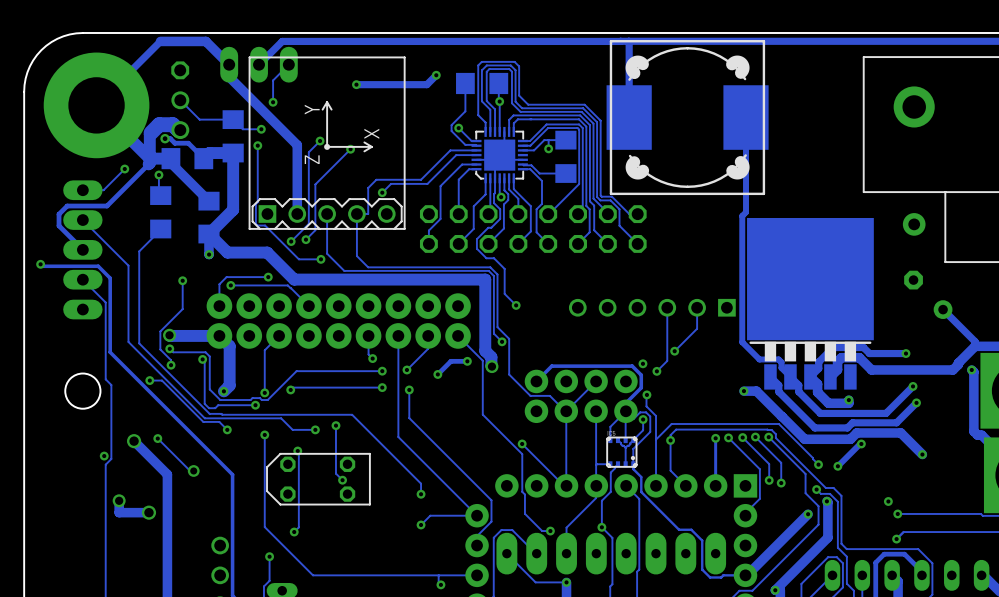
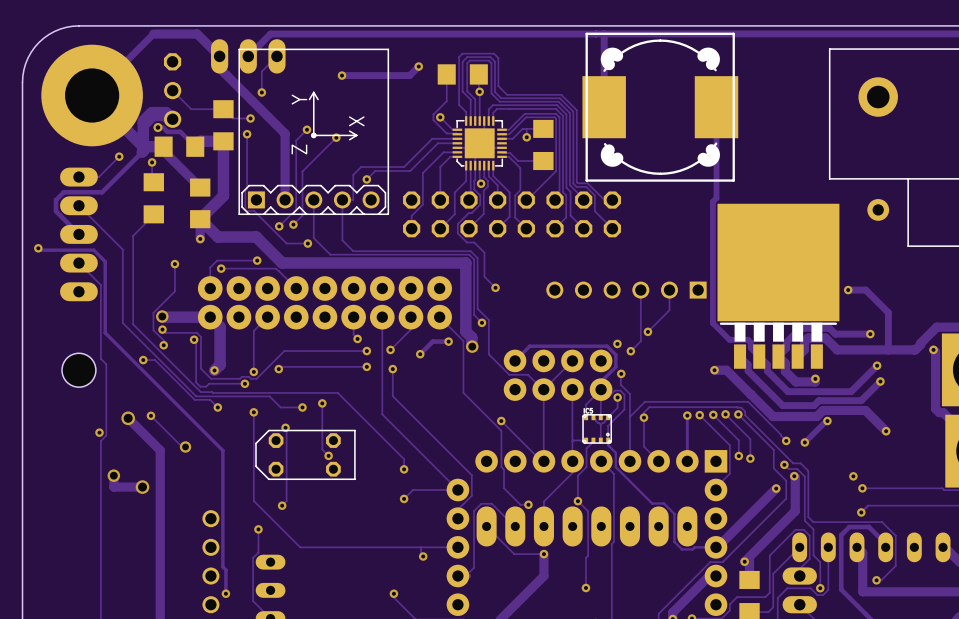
part: (928, 294) -> none
track: none -> (848, 290) (865, 290) (888, 312) (888, 349)
via: none -> (848, 290)
track: (943, 309) (975, 341) (975, 346) -> none

